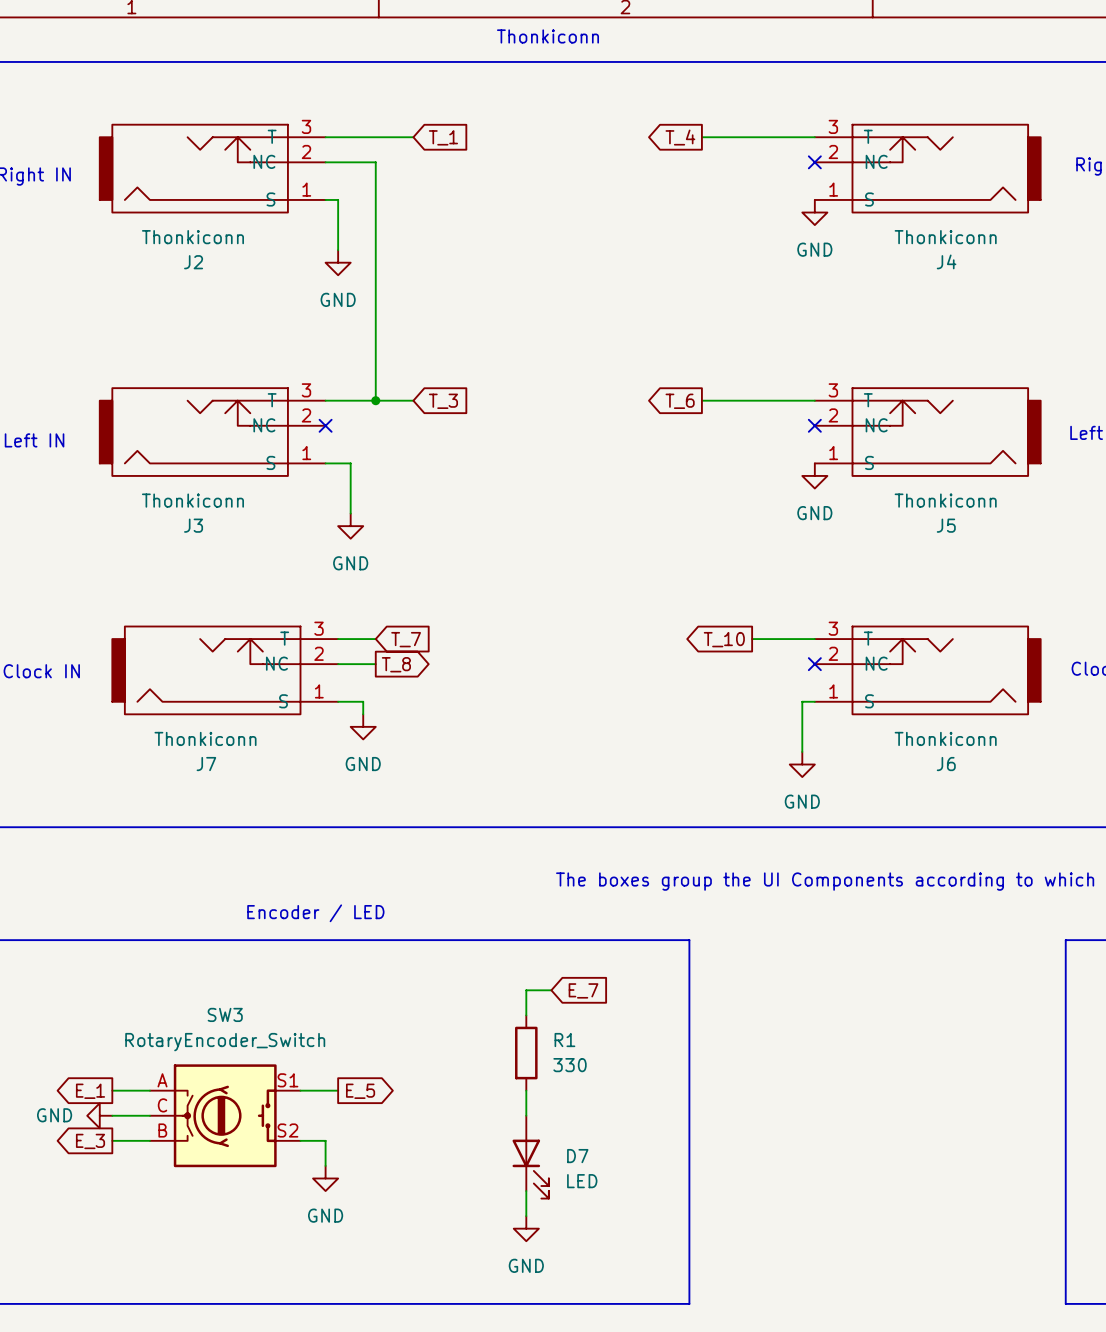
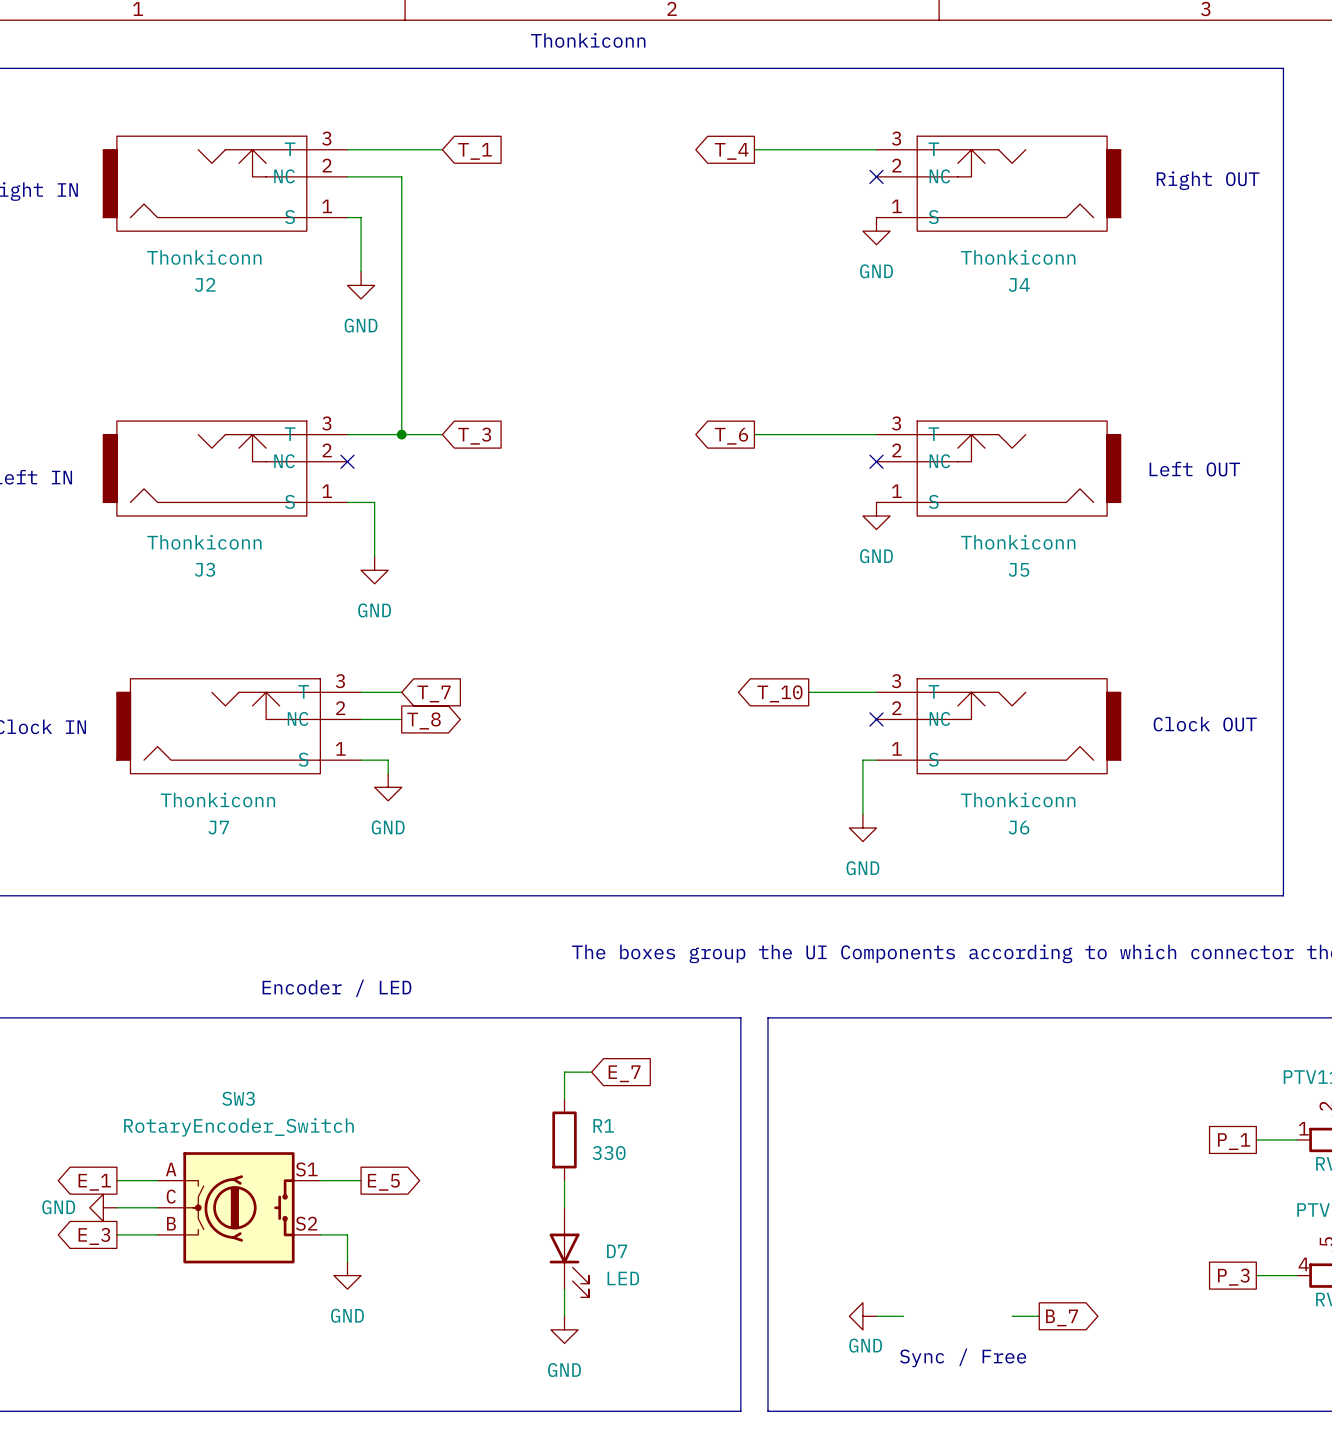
line: (1065, 940) (1065, 1303) -> (1147, 1017) (767, 1017) (767, 1411) (1147, 1411)
power symbol: none -> GND (862, 1316)
wire: none -> (876, 1316) (903, 1316)
wire: none -> (1012, 1316) (1039, 1316)
global label: none -> B_7 (1062, 1317)
text: none -> Sync / Free (963, 1357)

